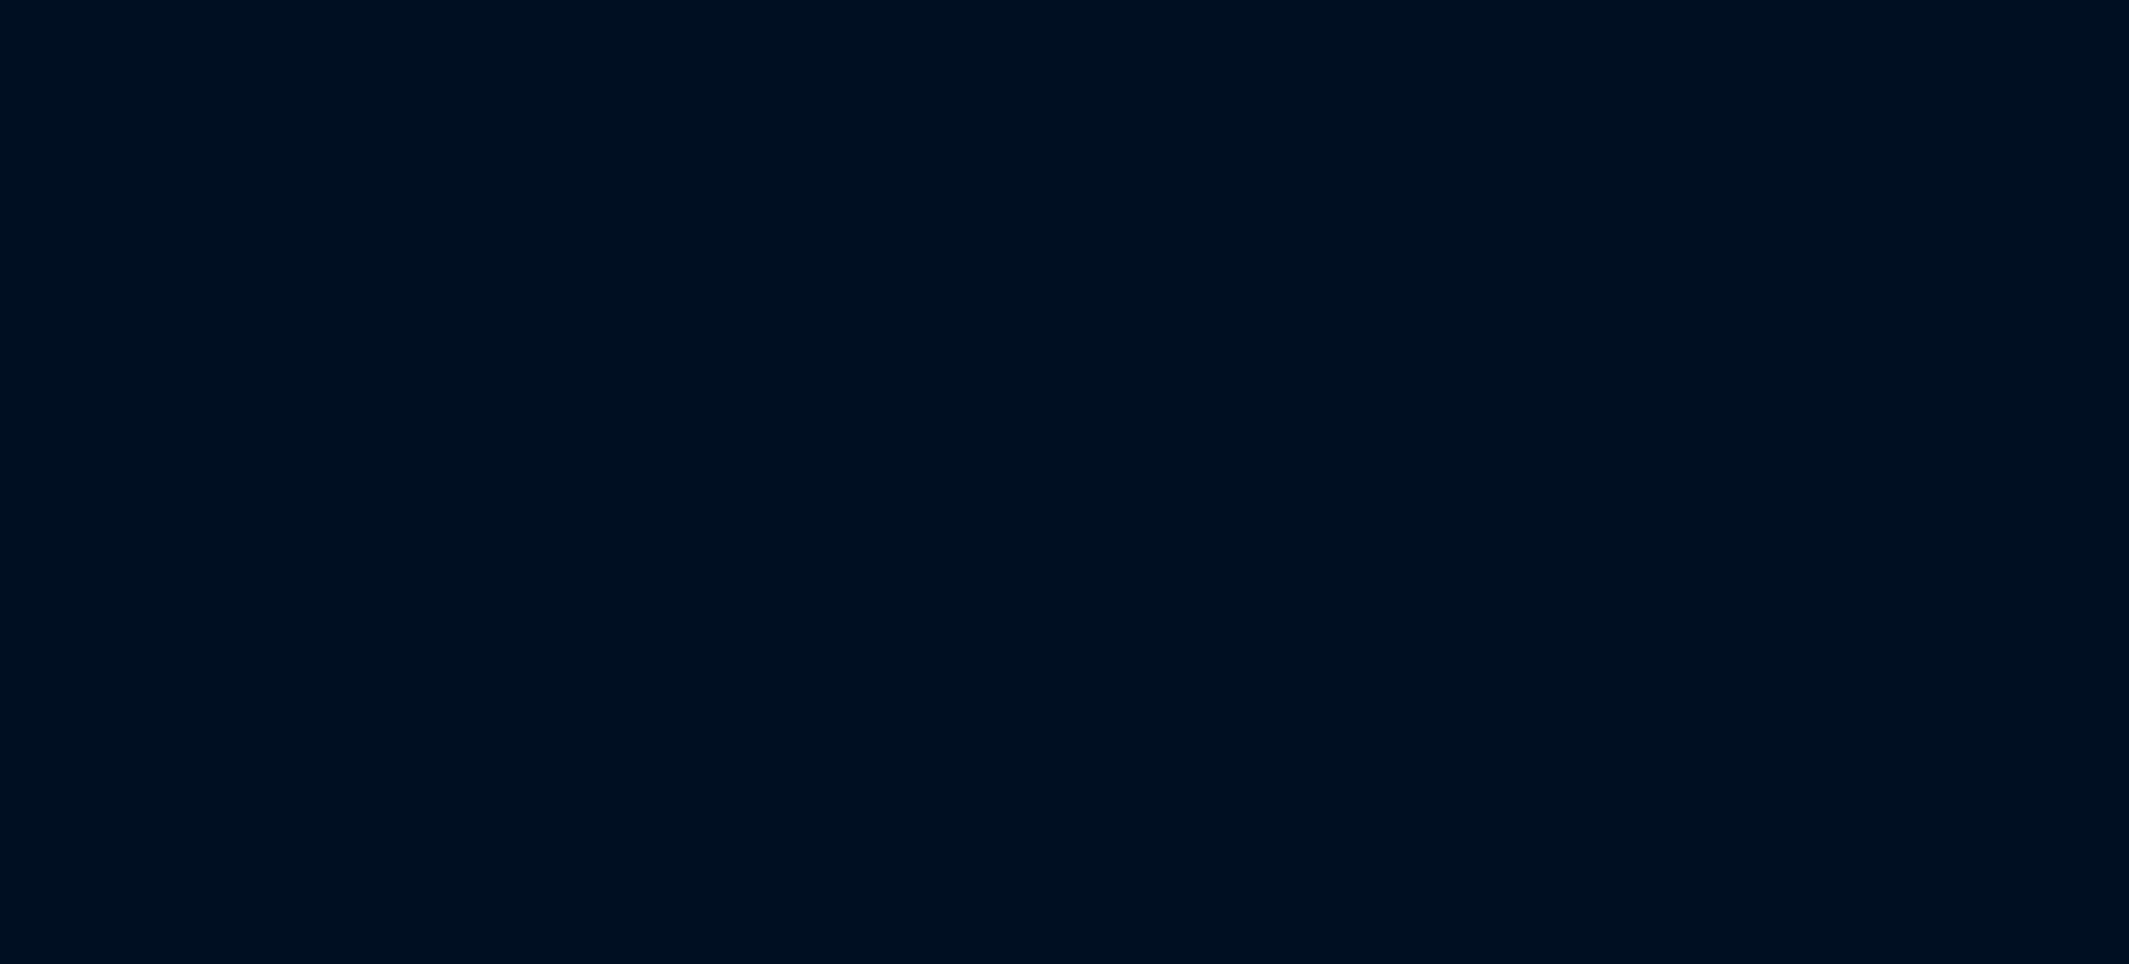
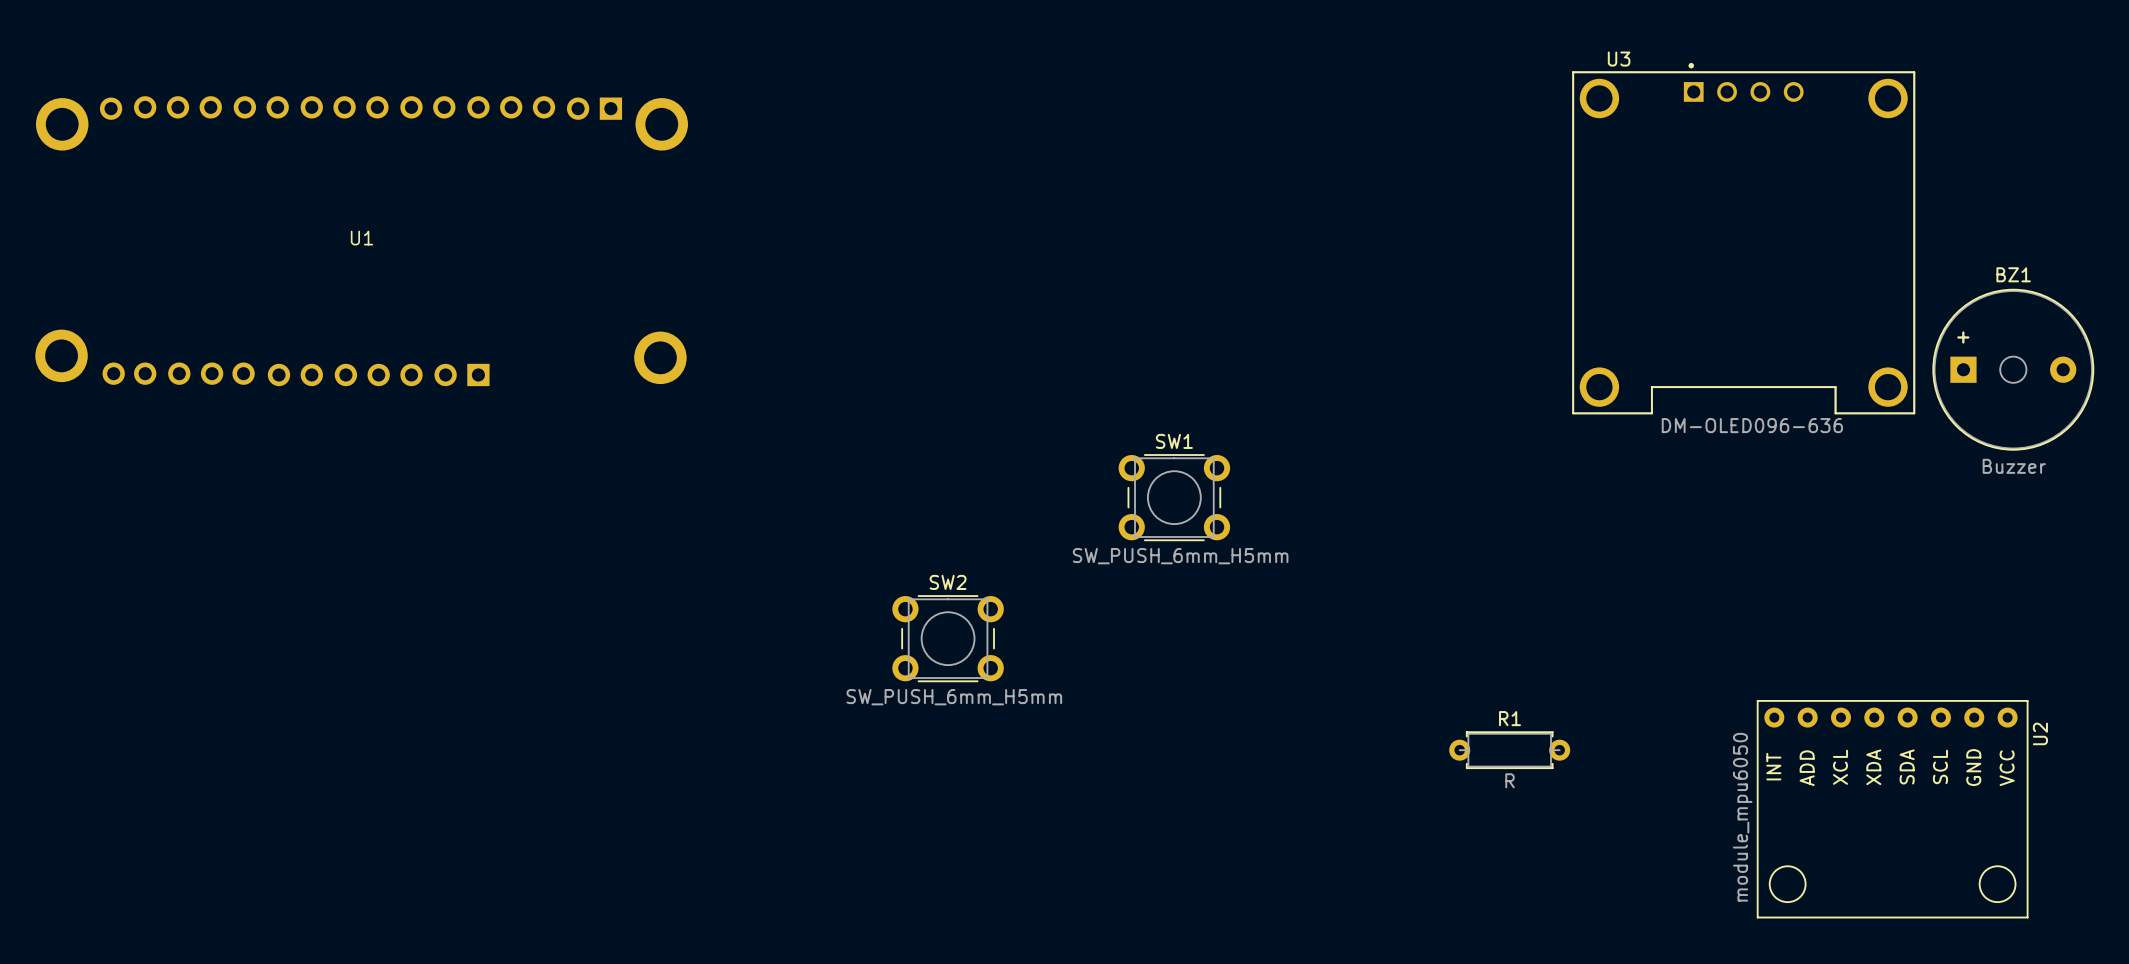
U3: none -> DM-OLED096-636 (1743, 238)
U1: none -> (361, 241)
BZ1: none -> Buzzer (2013, 369)
SW1: none -> SW_PUSH_6mm_H5mm (1174, 497)
SW2: none -> SW_PUSH_6mm_H5mm (948, 638)
R1: none -> R (1509, 750)
U2: none -> module_mpu6050 (1892, 809)

